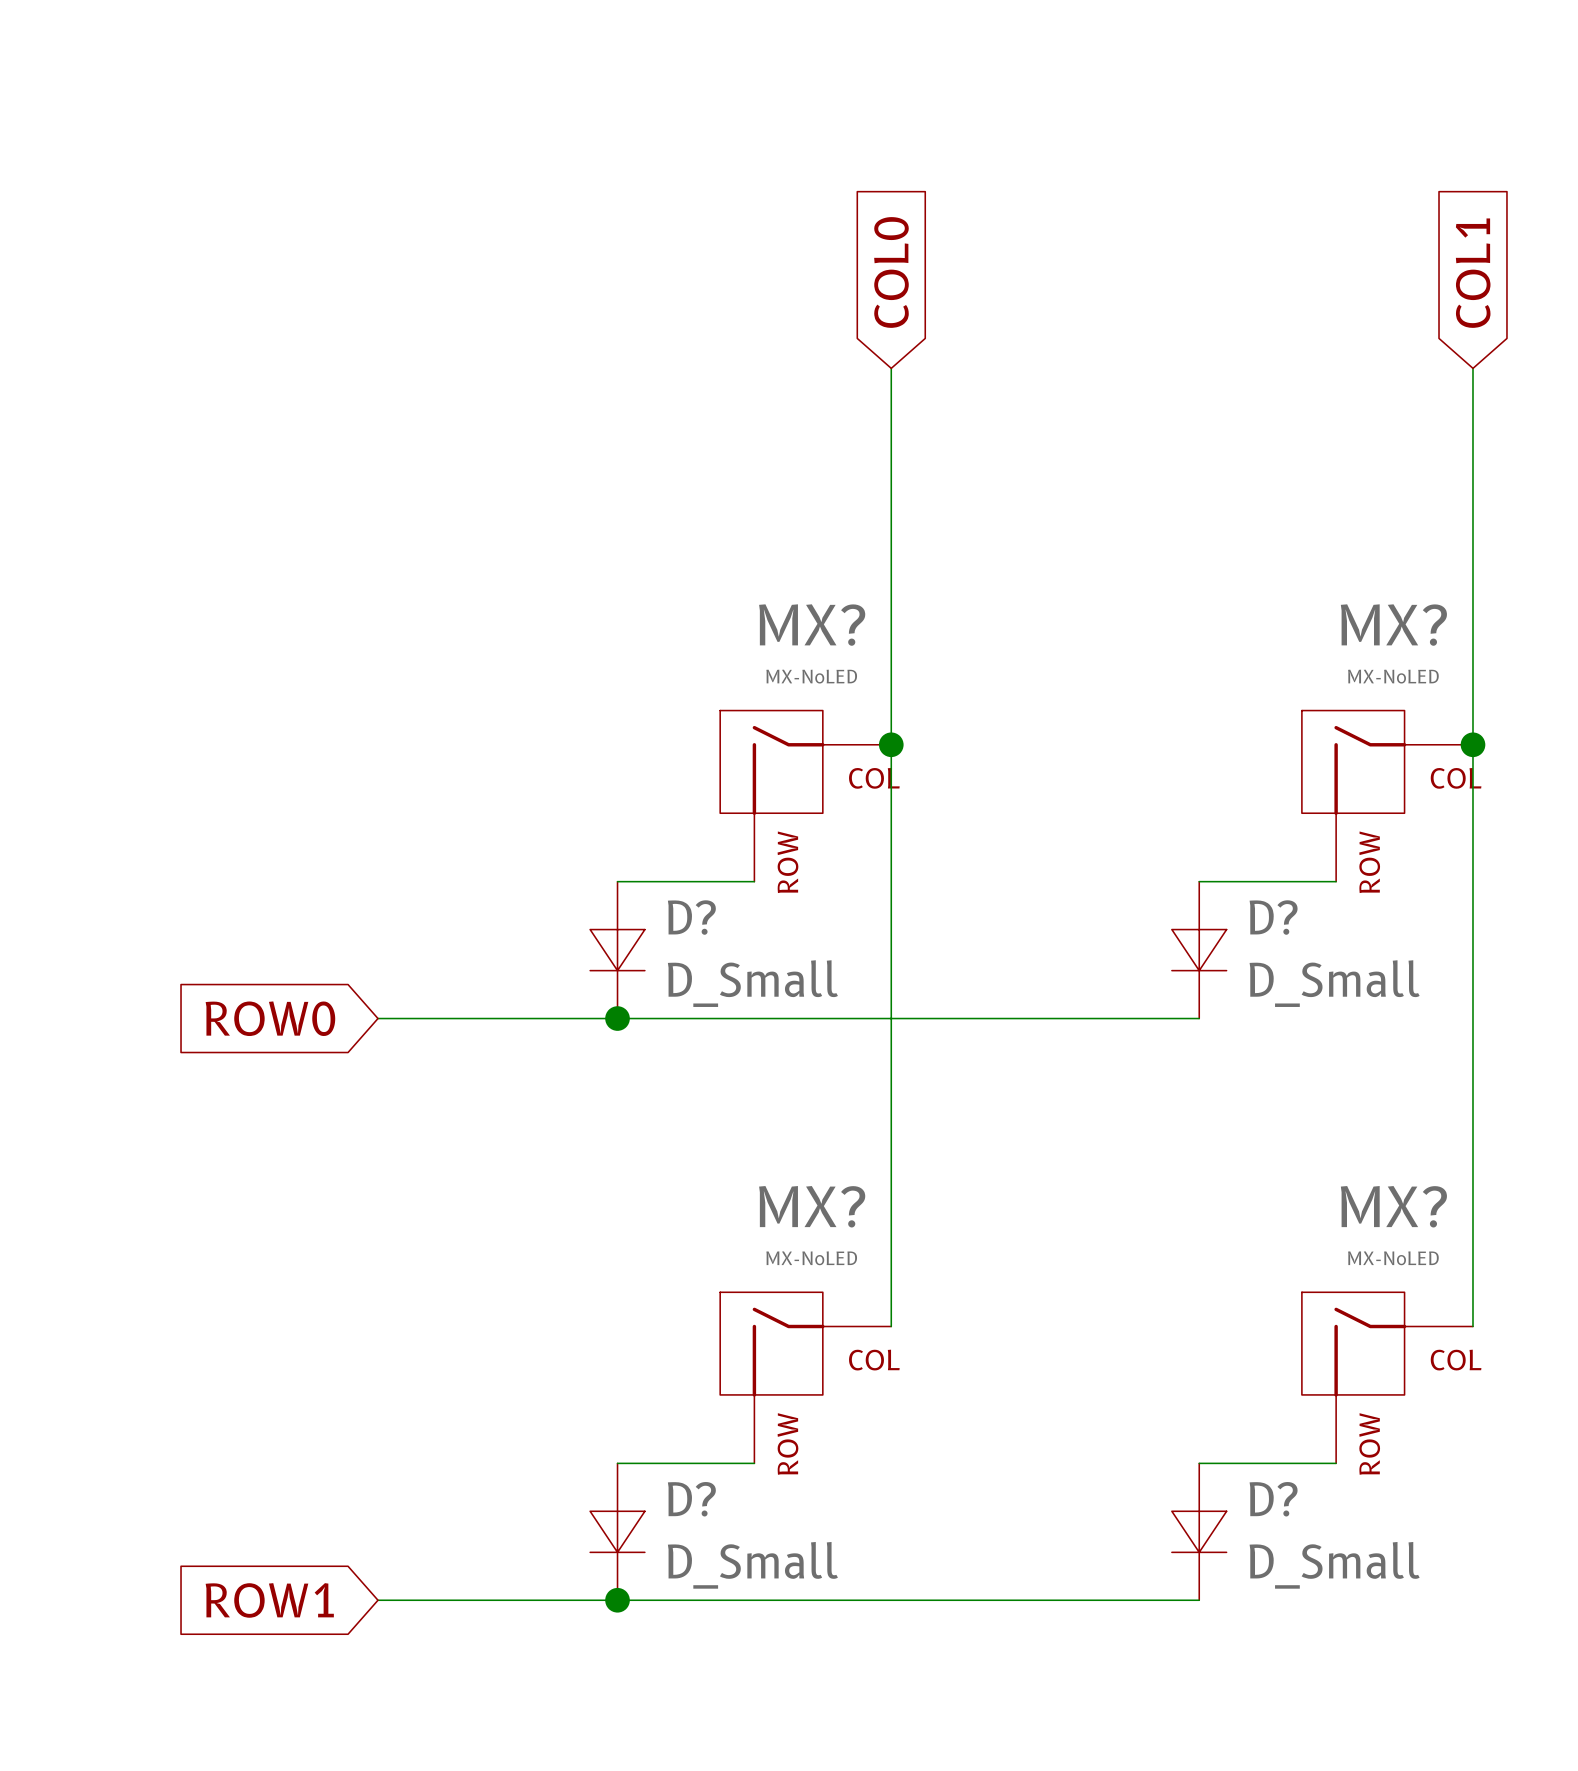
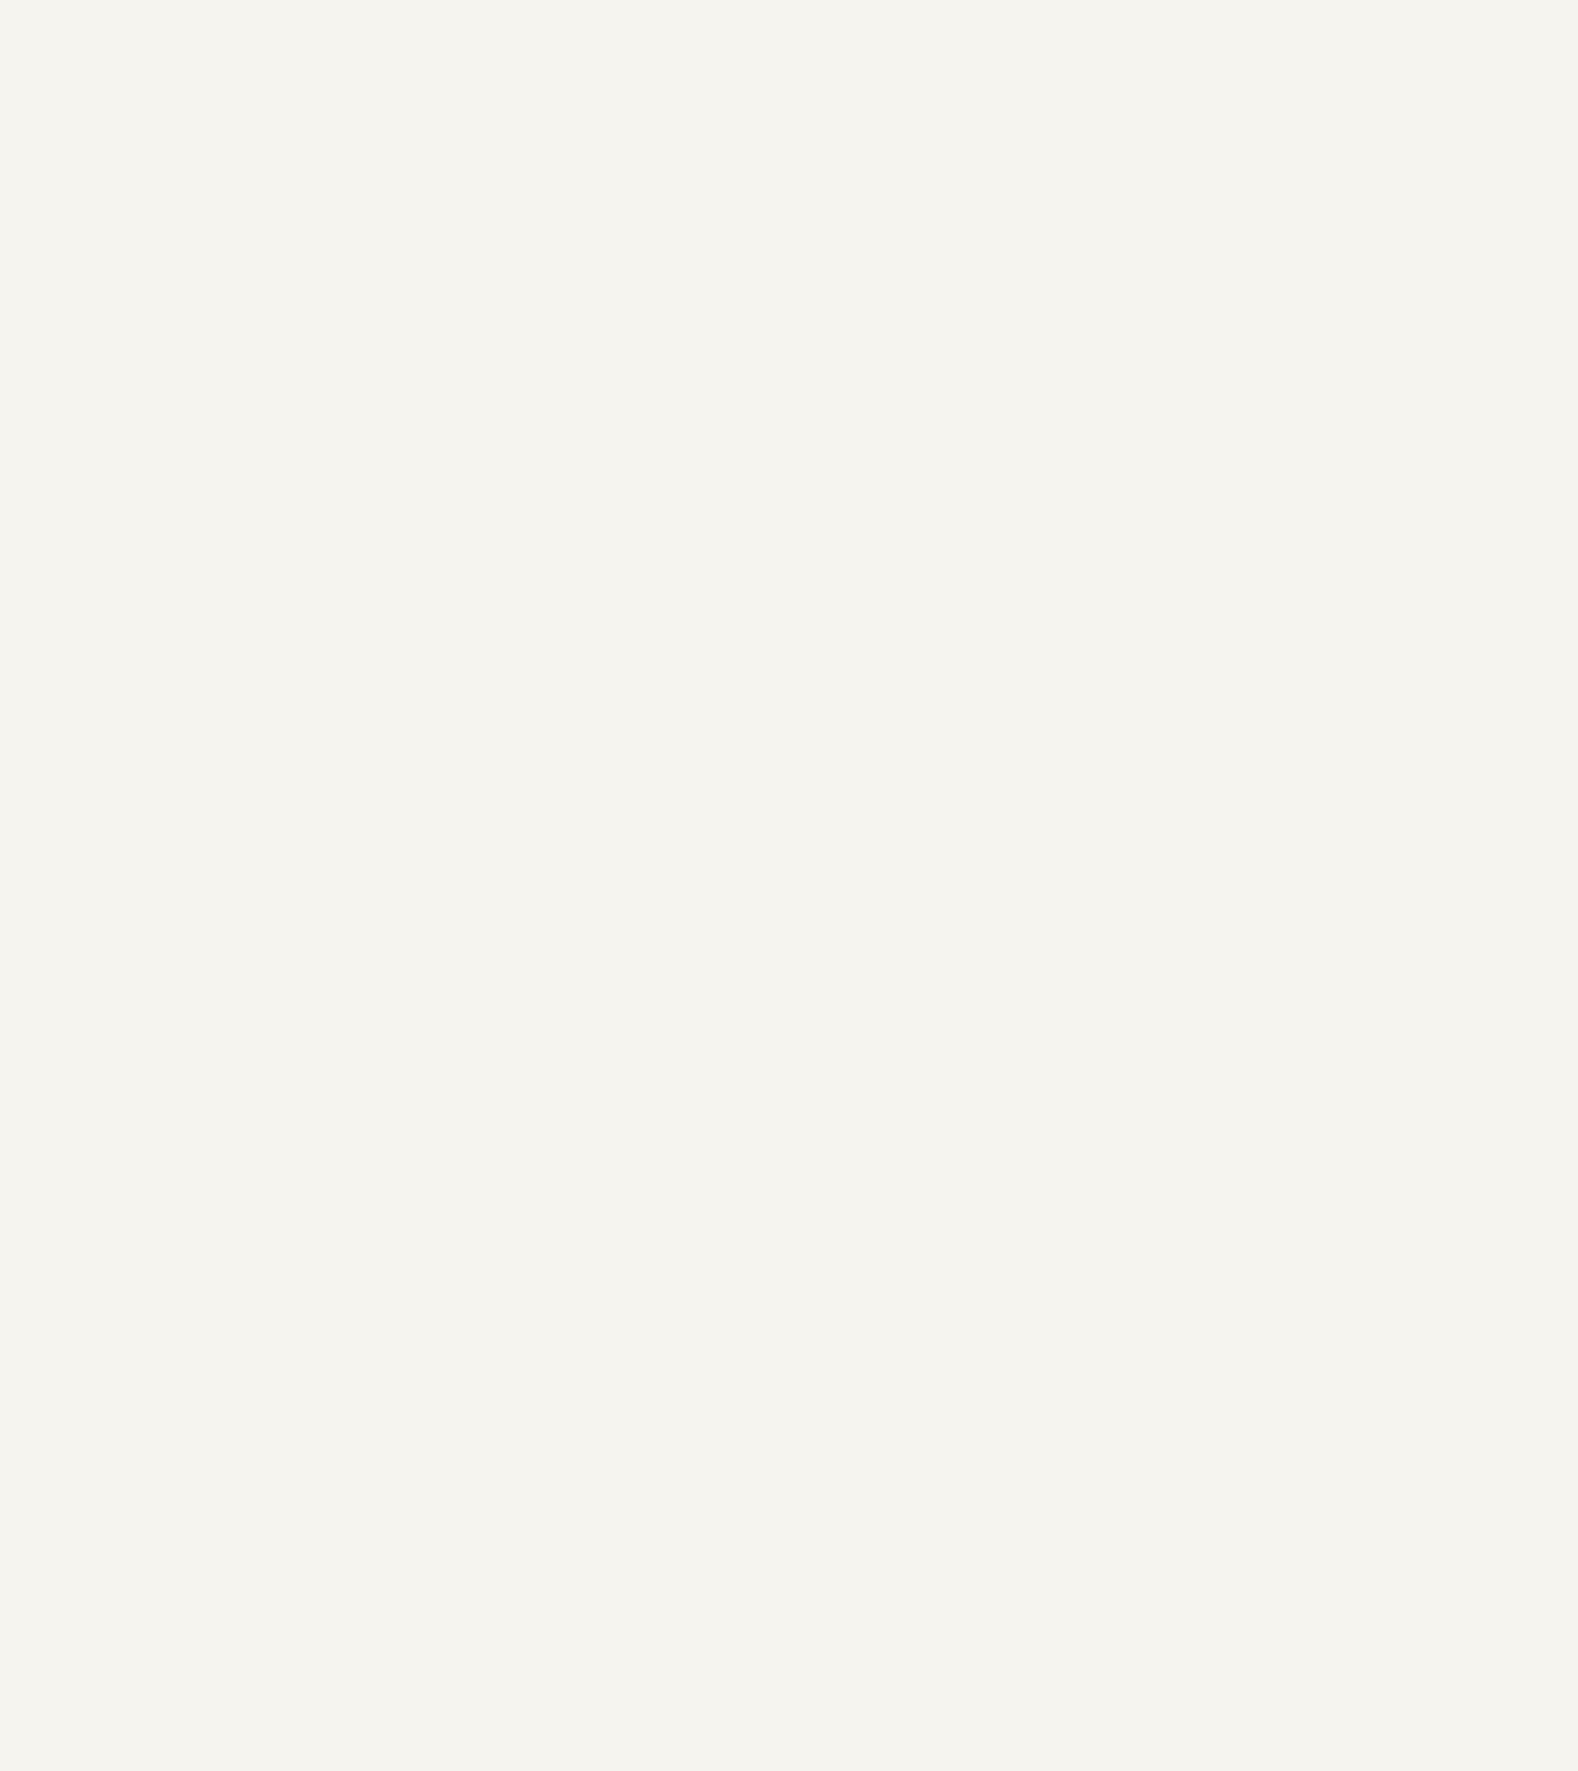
global label: COL0 (891, 272) -> none
global label: COL1 (1473, 273) -> none
wire: (891, 368) (891, 1326) -> none
wire: (1472, 368) (1472, 1326) -> none
junction: (891, 744) -> none
junction: (1472, 744) -> none
MX?: MX-NoLED (805, 796) -> none
MX?: MX-NoLED (1387, 796) -> none
wire: (617, 881) (754, 881) -> none
wire: (1199, 881) (1336, 881) -> none
D?: D_Small (617, 950) -> none
D?: D_Small (1199, 950) -> none
global label: ROW0 (270, 1018) -> none
wire: (377, 1018) (1199, 1018) -> none
junction: (617, 1018) -> none
MX?: MX-NoLED (805, 1377) -> none
MX?: MX-NoLED (1387, 1377) -> none
wire: (617, 1463) (754, 1463) -> none
wire: (1199, 1463) (1336, 1463) -> none
D?: D_Small (617, 1531) -> none
D?: D_Small (1199, 1531) -> none
global label: ROW1 (269, 1600) -> none
wire: (377, 1600) (1199, 1600) -> none
junction: (617, 1600) -> none

